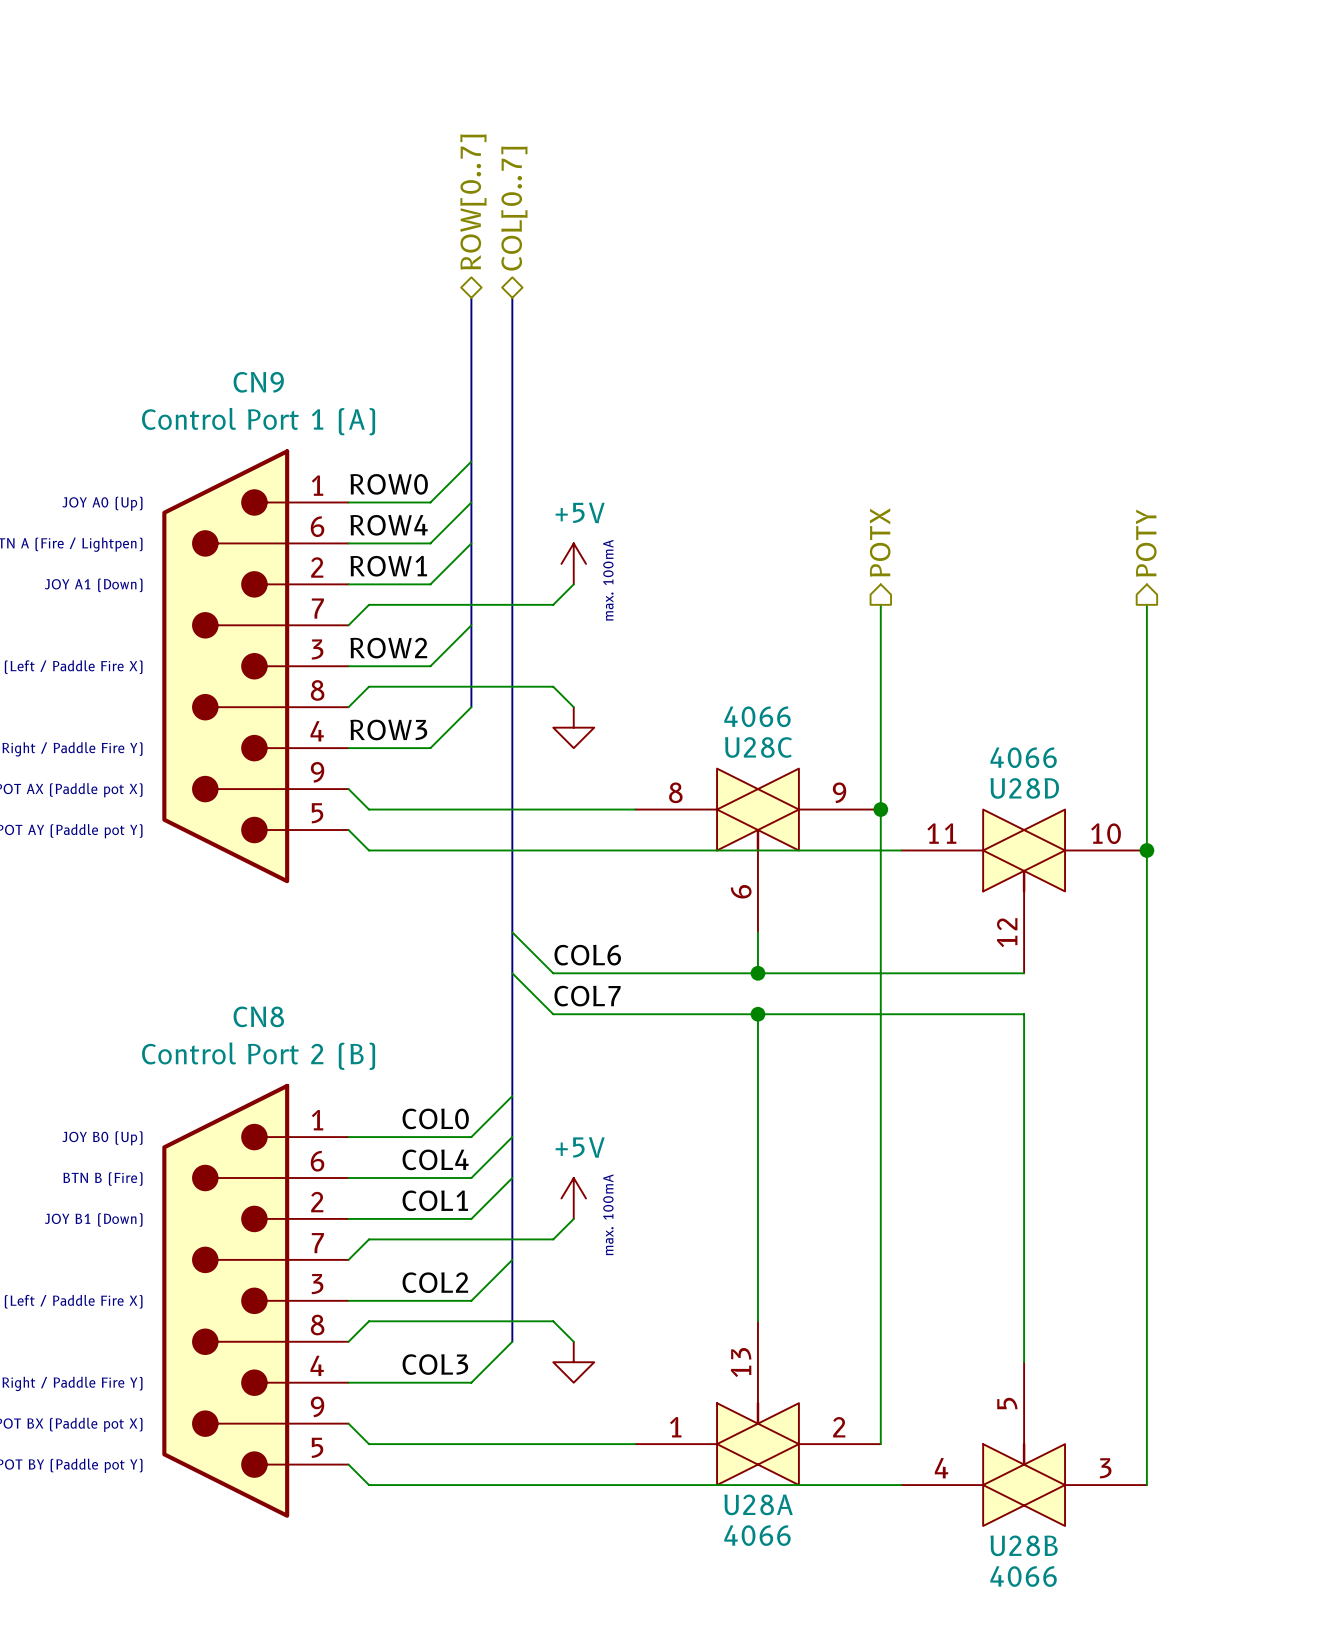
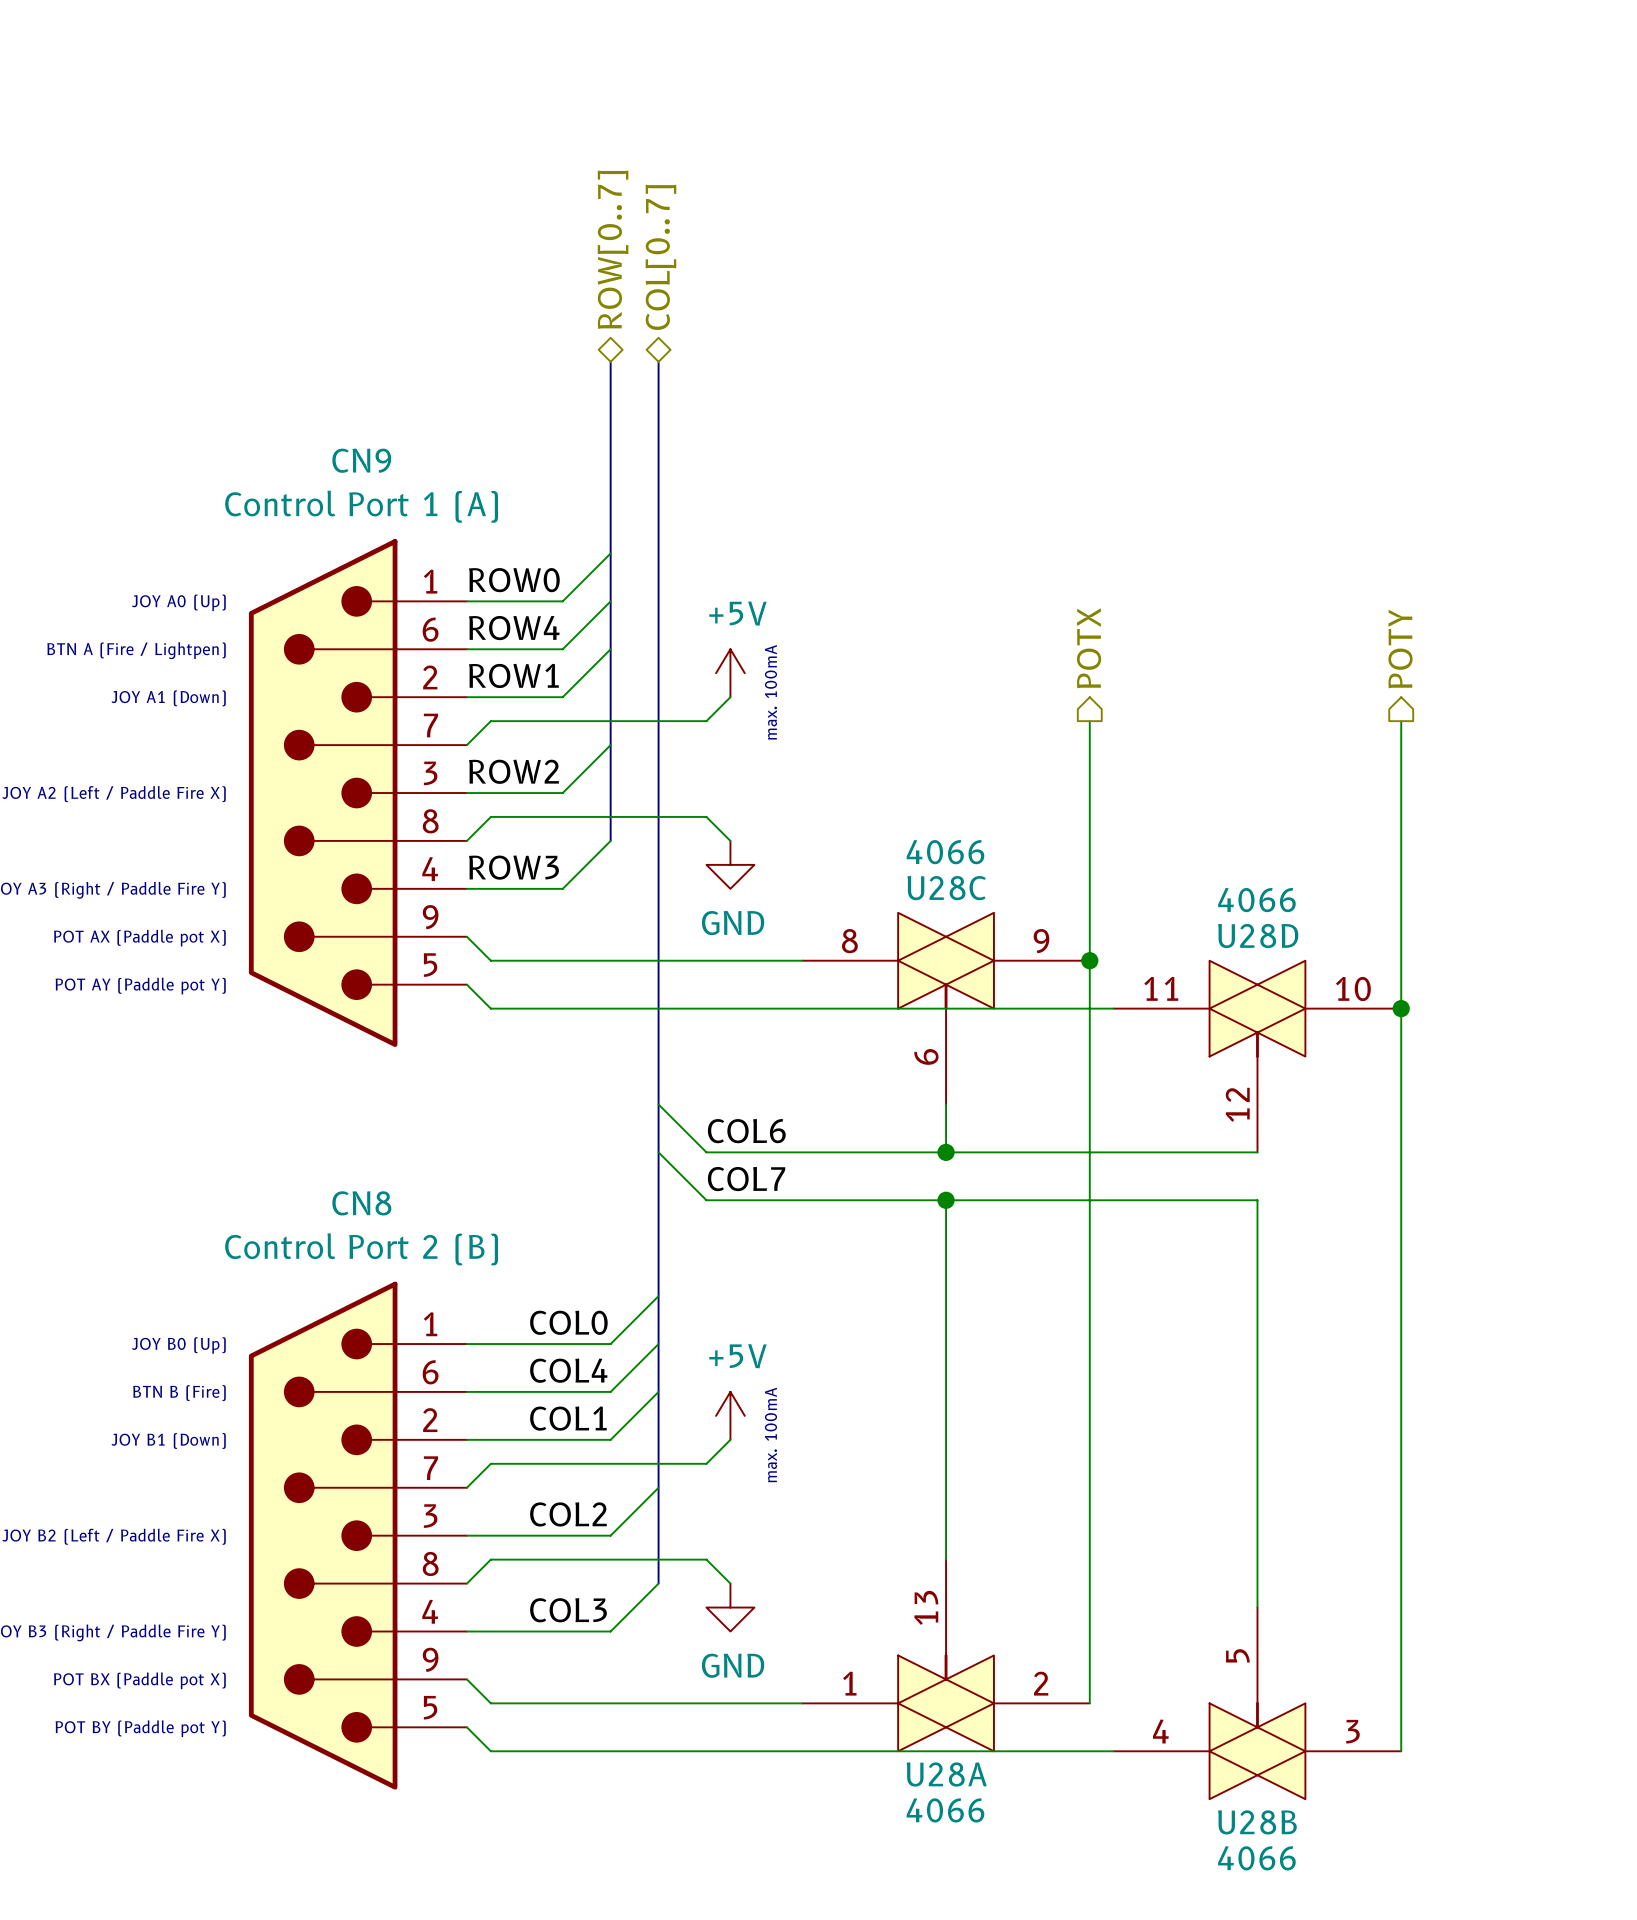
power symbol text: none -> GND (733, 923)
power symbol text: none -> GND (733, 1665)

